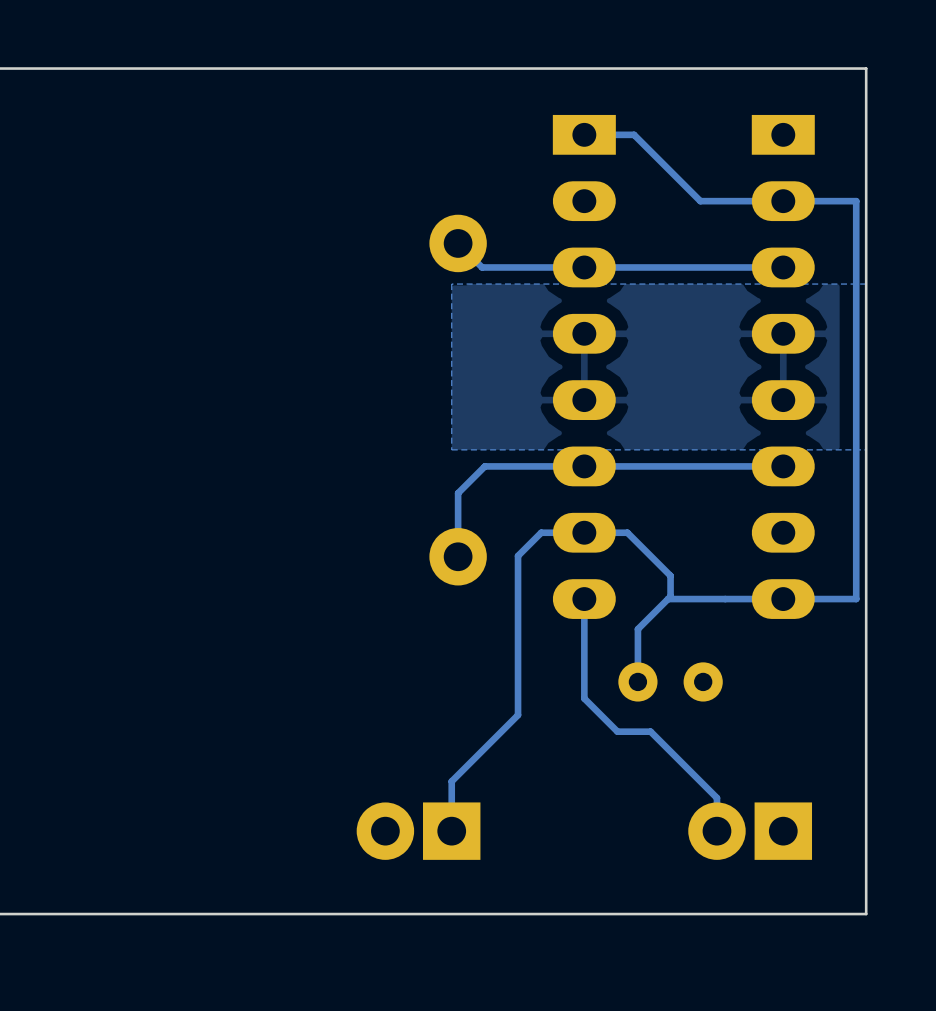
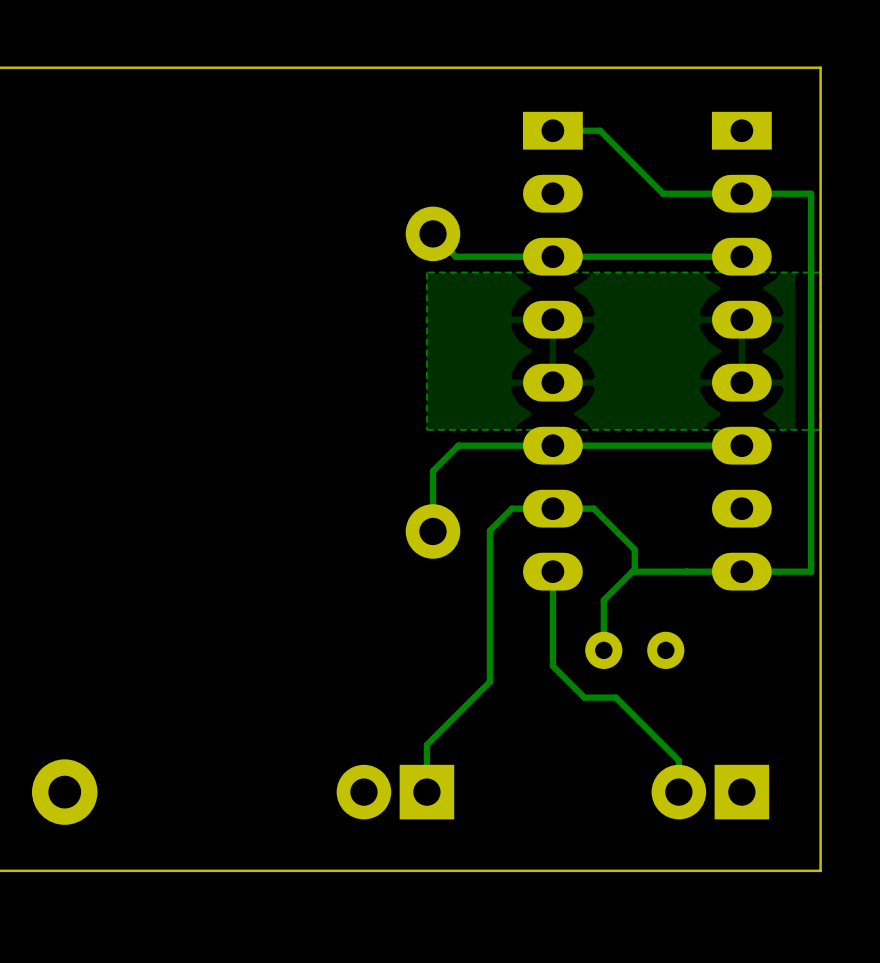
part: none -> (64, 792)

